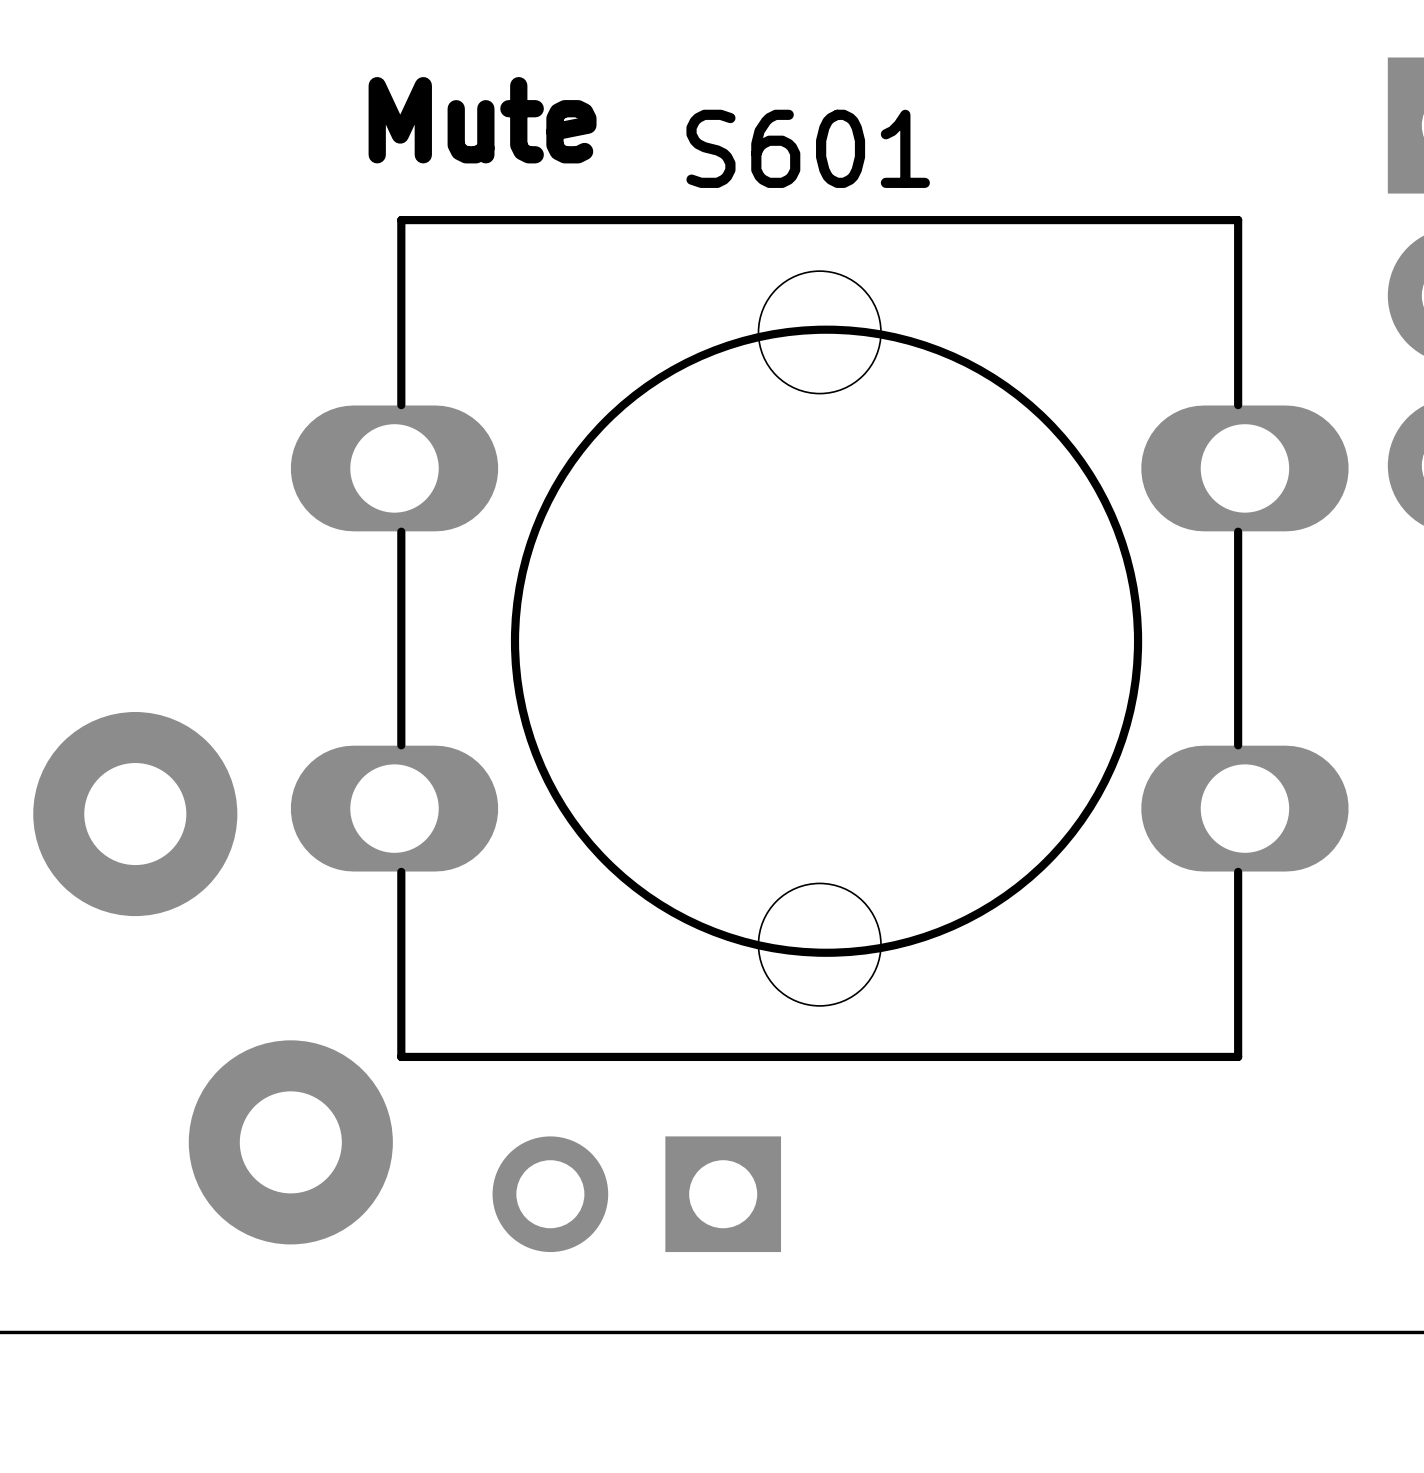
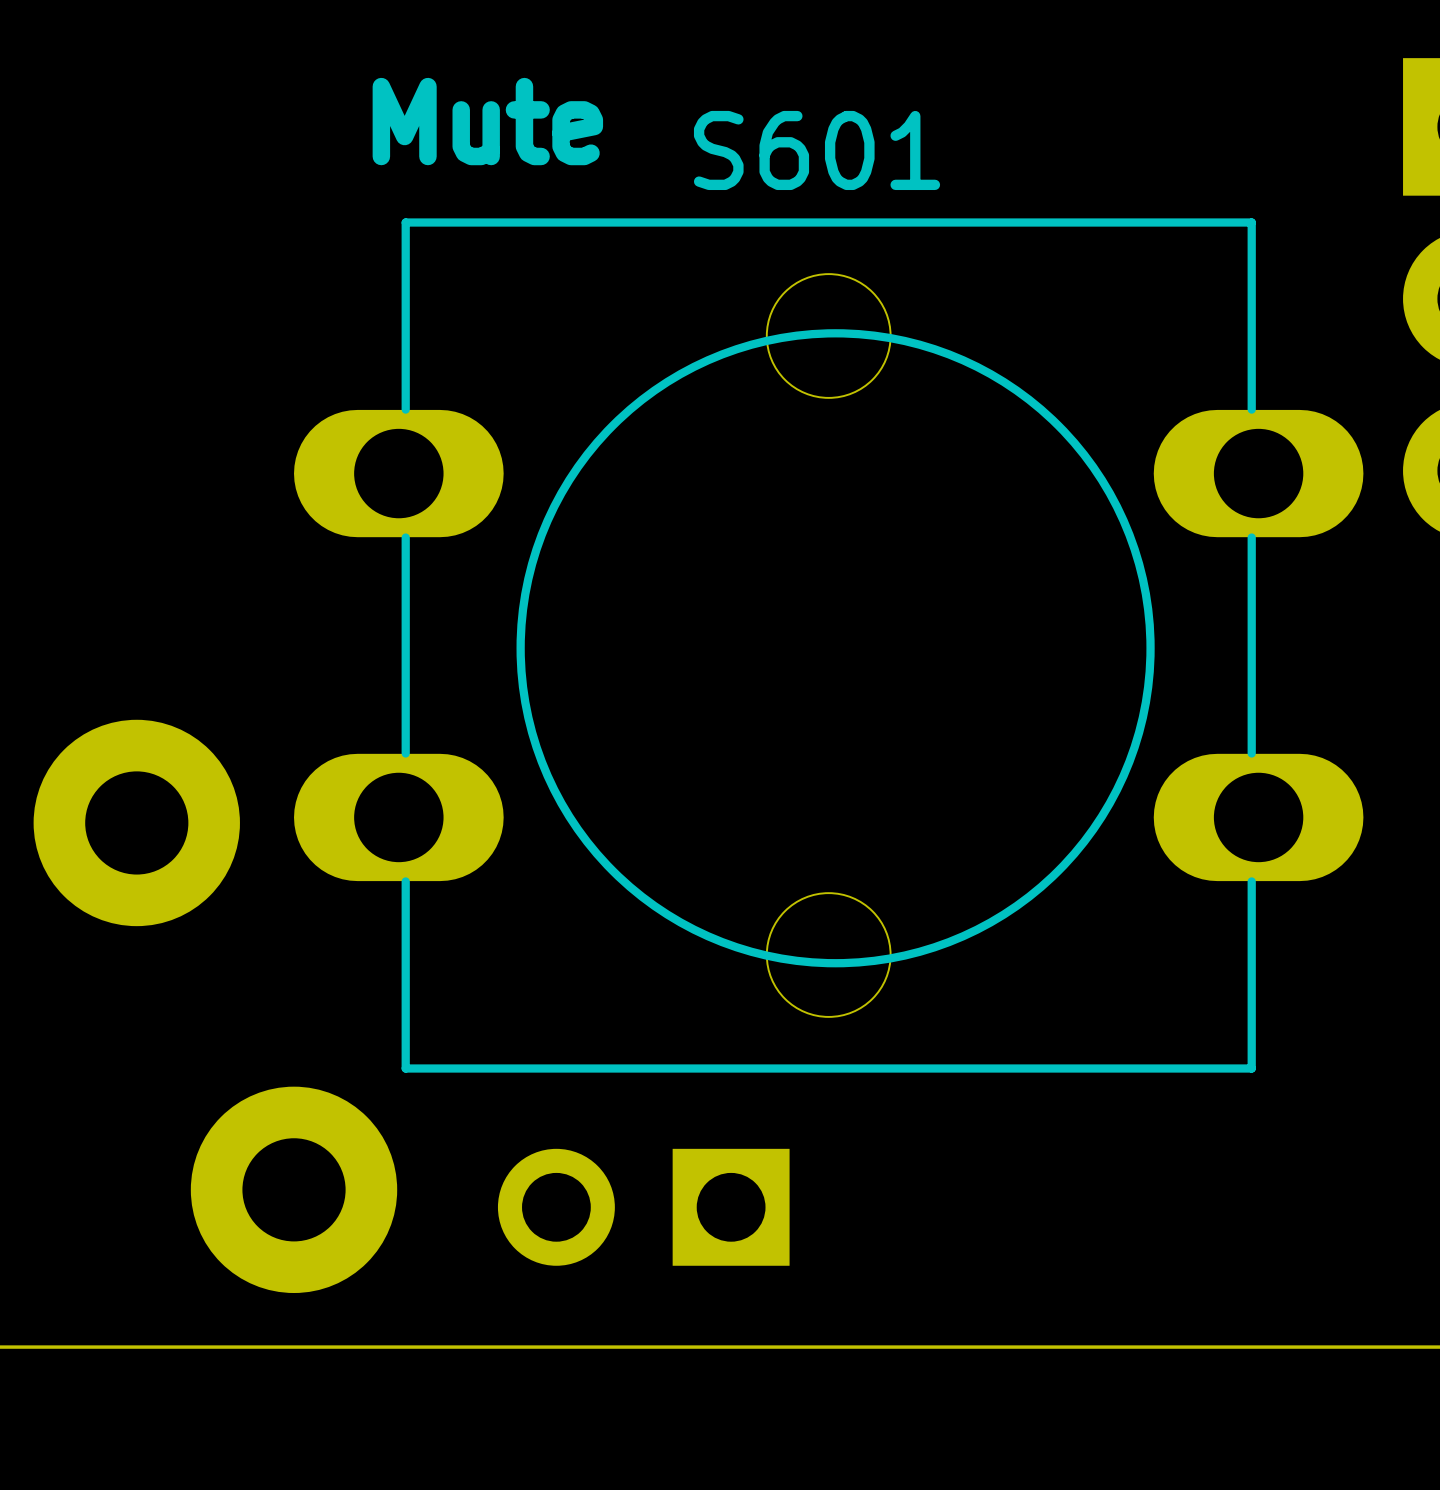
part position: (290, 1142) -> (294, 1189)

